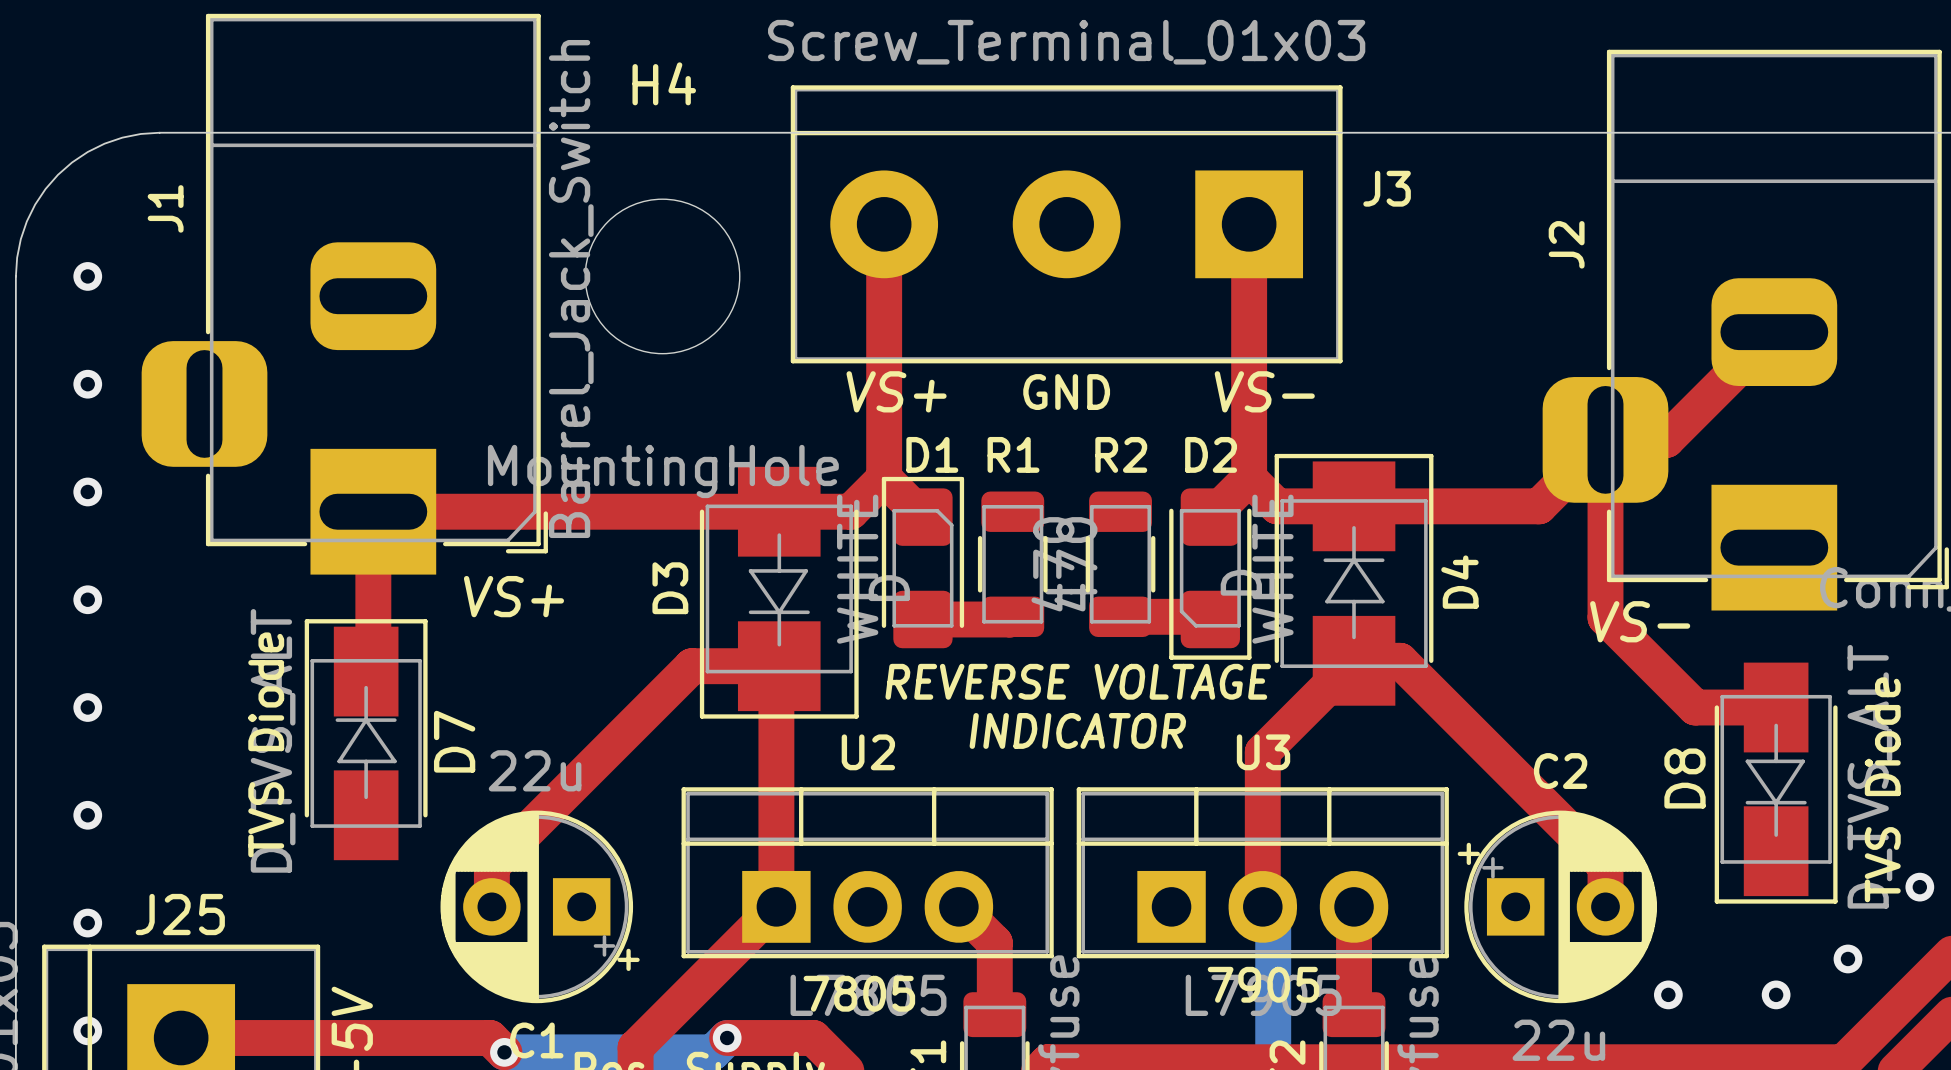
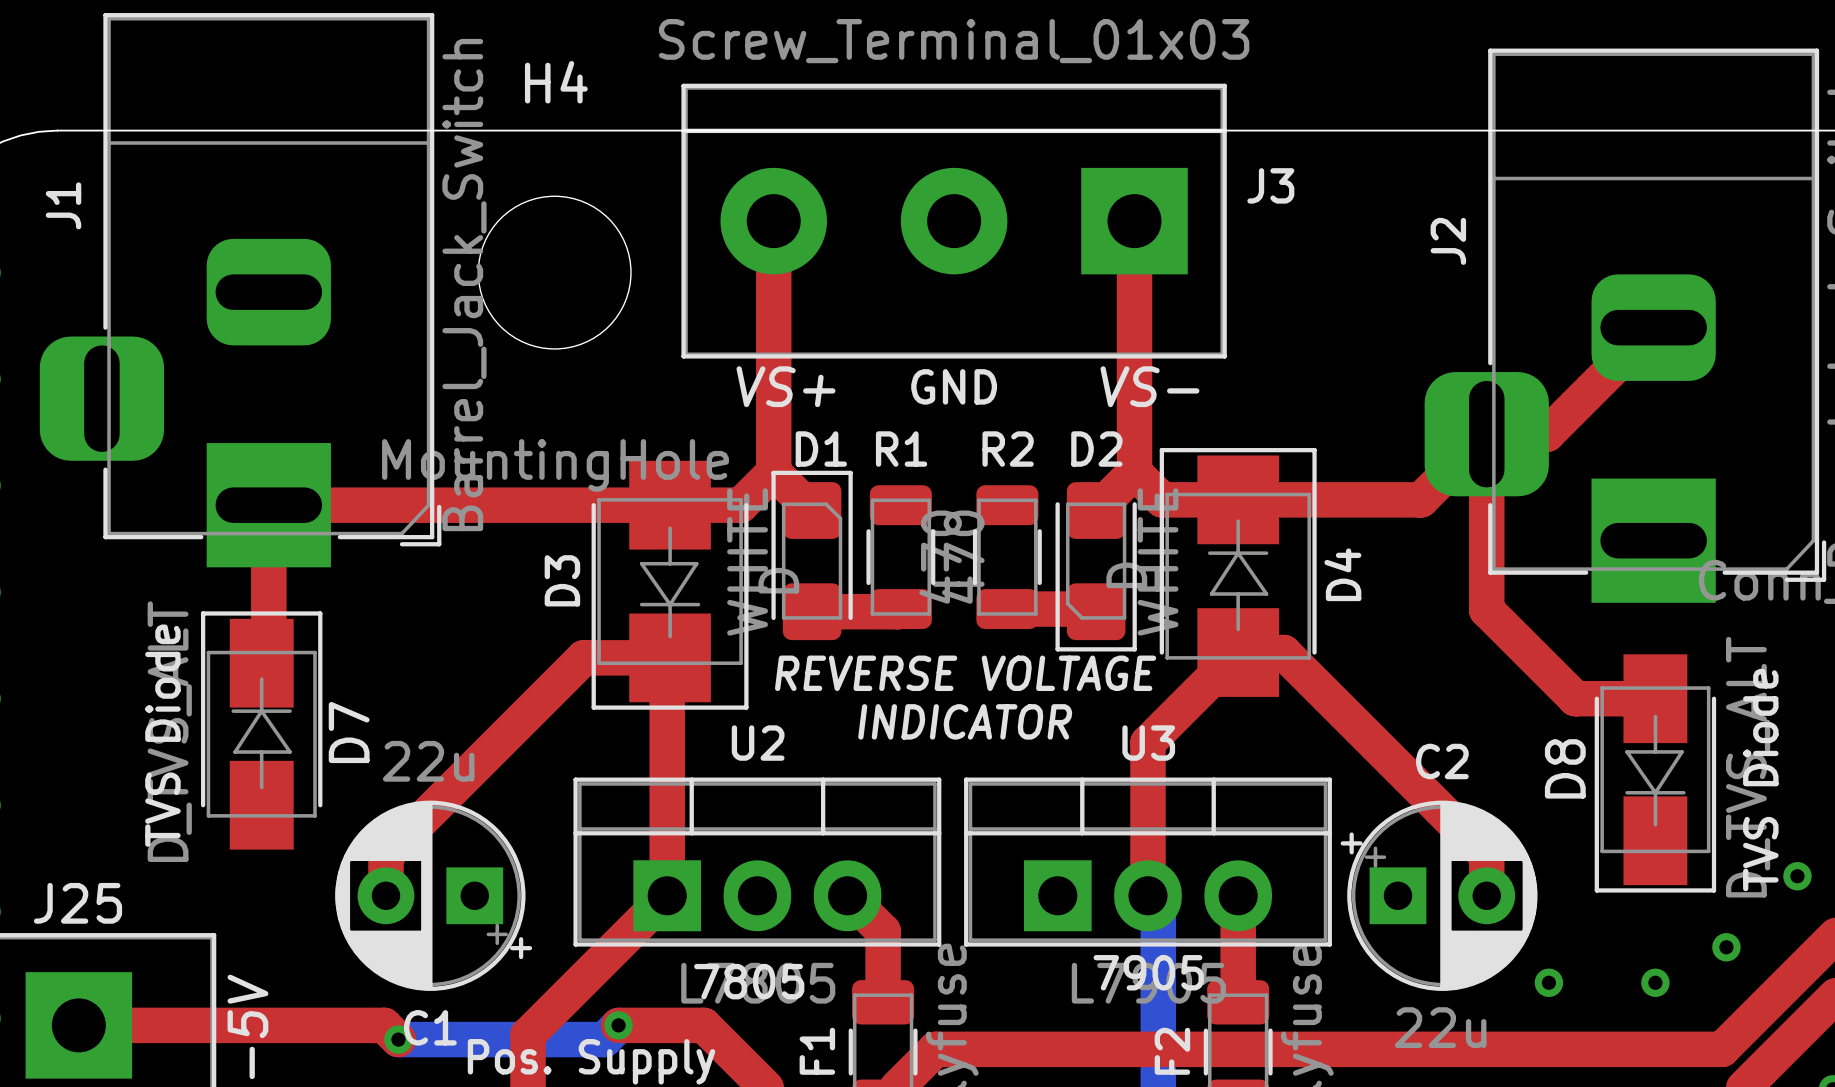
text: VS+ (513, 596) -> none
text: VS- (1640, 621) -> none

